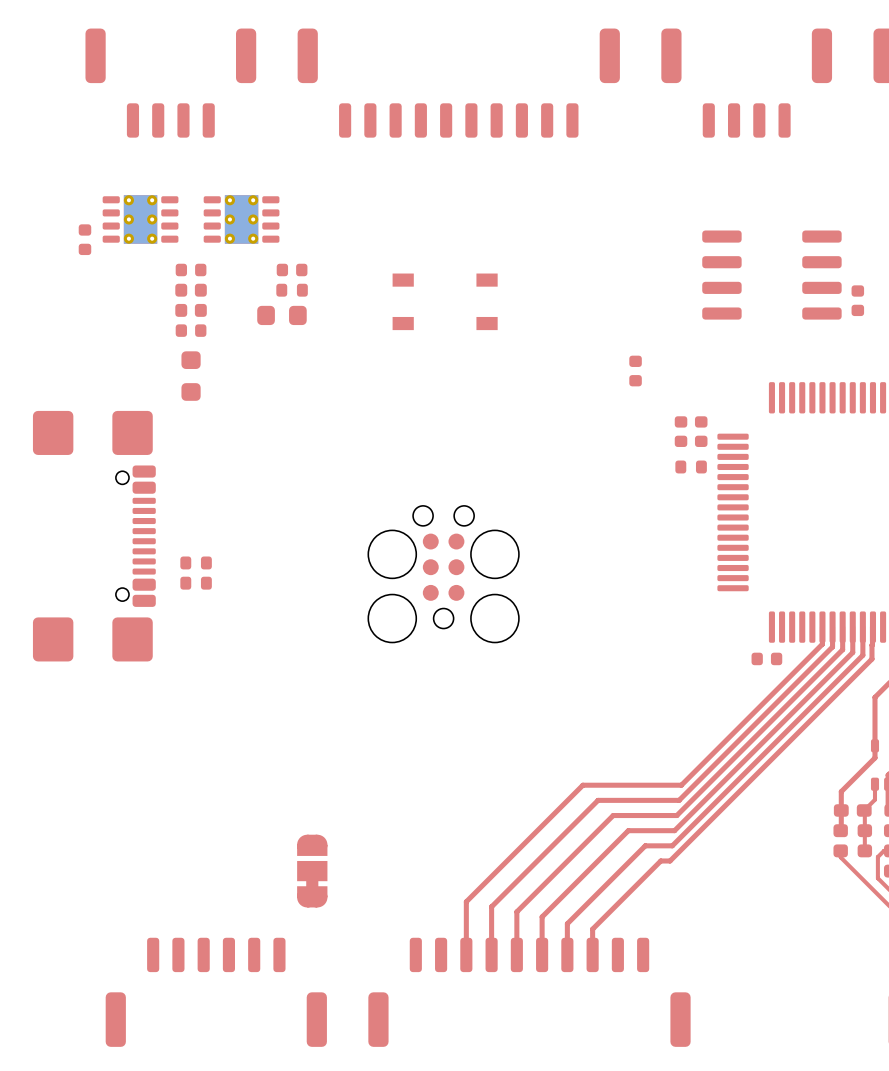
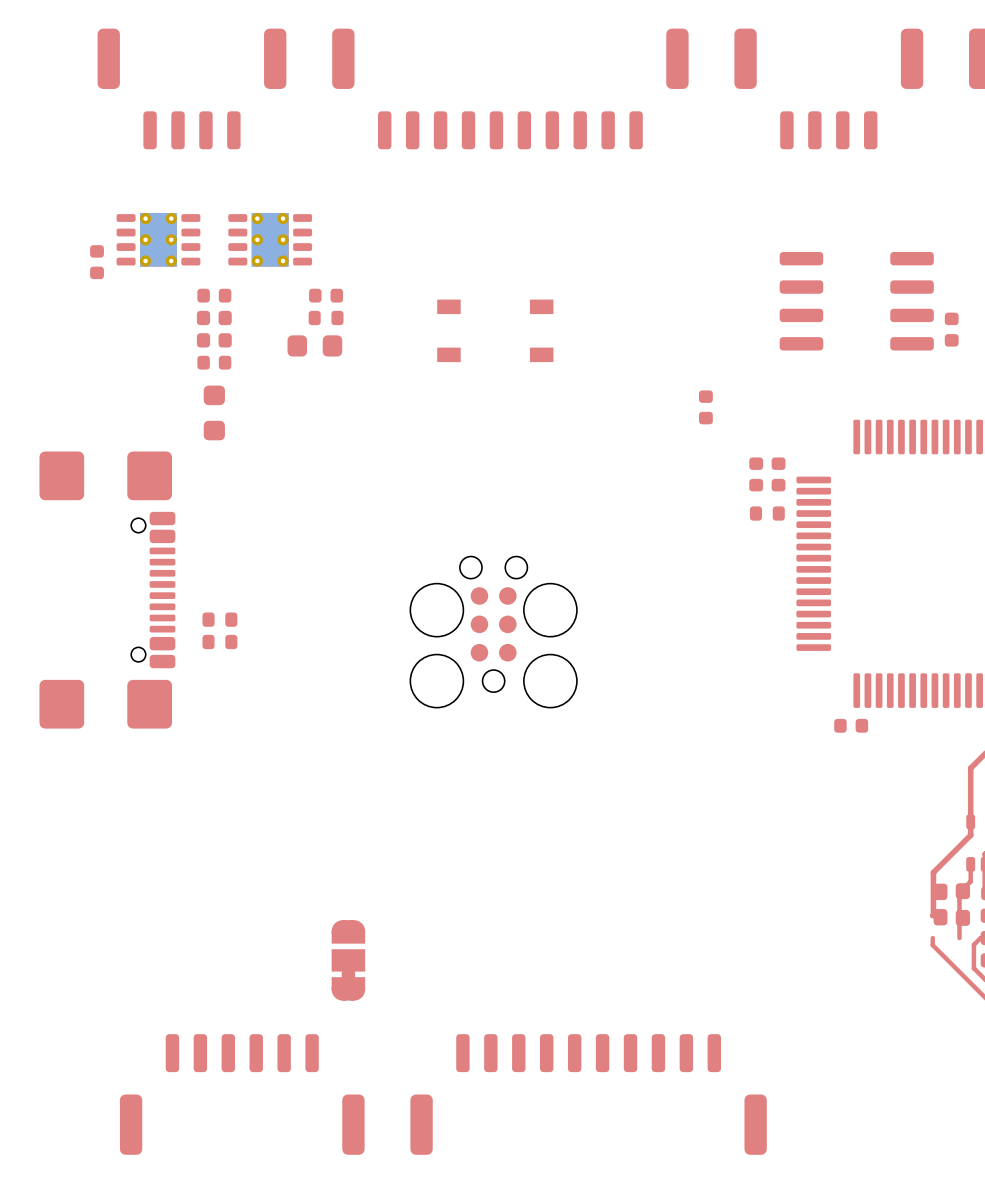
top track: (822, 627) (822, 644) (681, 785) (582, 785) (466, 901) (466, 954) -> none
top track: (832, 627) (832, 646) (679, 800) (598, 800) (491, 906) (491, 954) -> none
top track: (842, 627) (842, 649) (676, 815) (613, 815) (516, 911) (516, 954) -> none
top track: (852, 627) (852, 652) (674, 830) (628, 830) (542, 916) (542, 954) -> none
top track: (862, 627) (862, 655) (672, 845) (645, 845) (567, 923) (567, 954) -> none
top track: (872, 627) (871, 659) (670, 860) (660, 860) (592, 929) (592, 954) -> none
part rotation: 0° (852, 810) -> 90° clockwise (940, 904)
part: none -> (962, 904)
part: (852, 830) -> none
part: (852, 850) -> none

